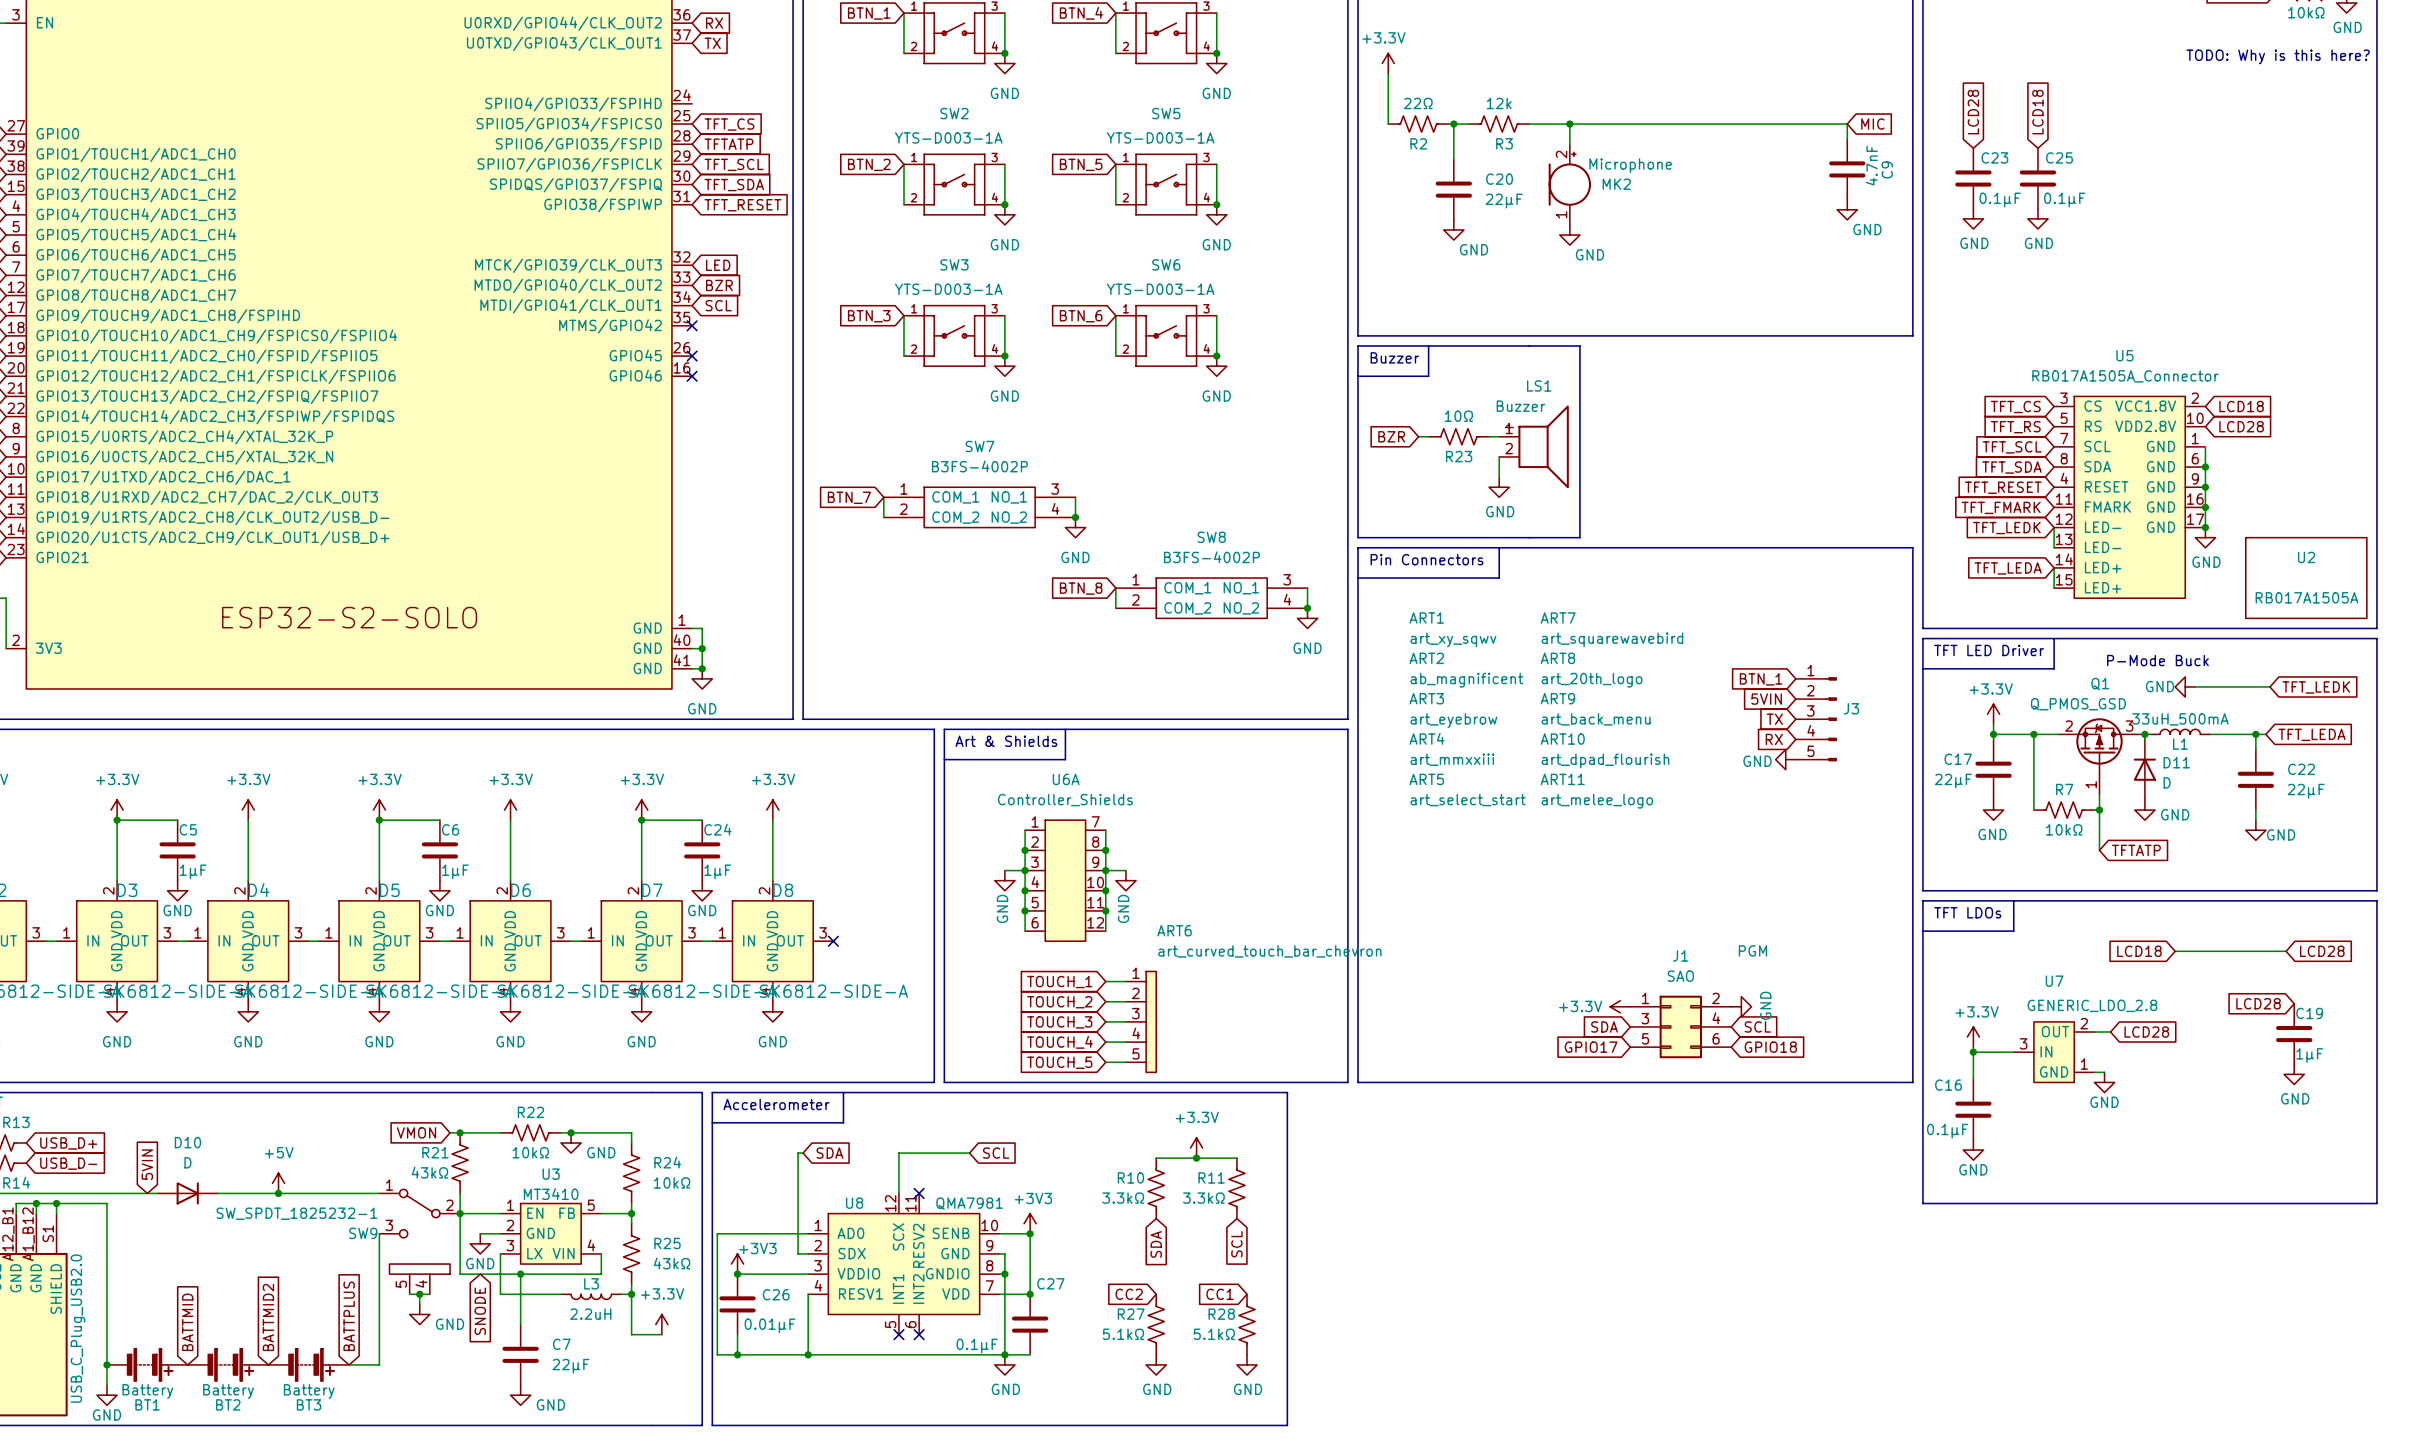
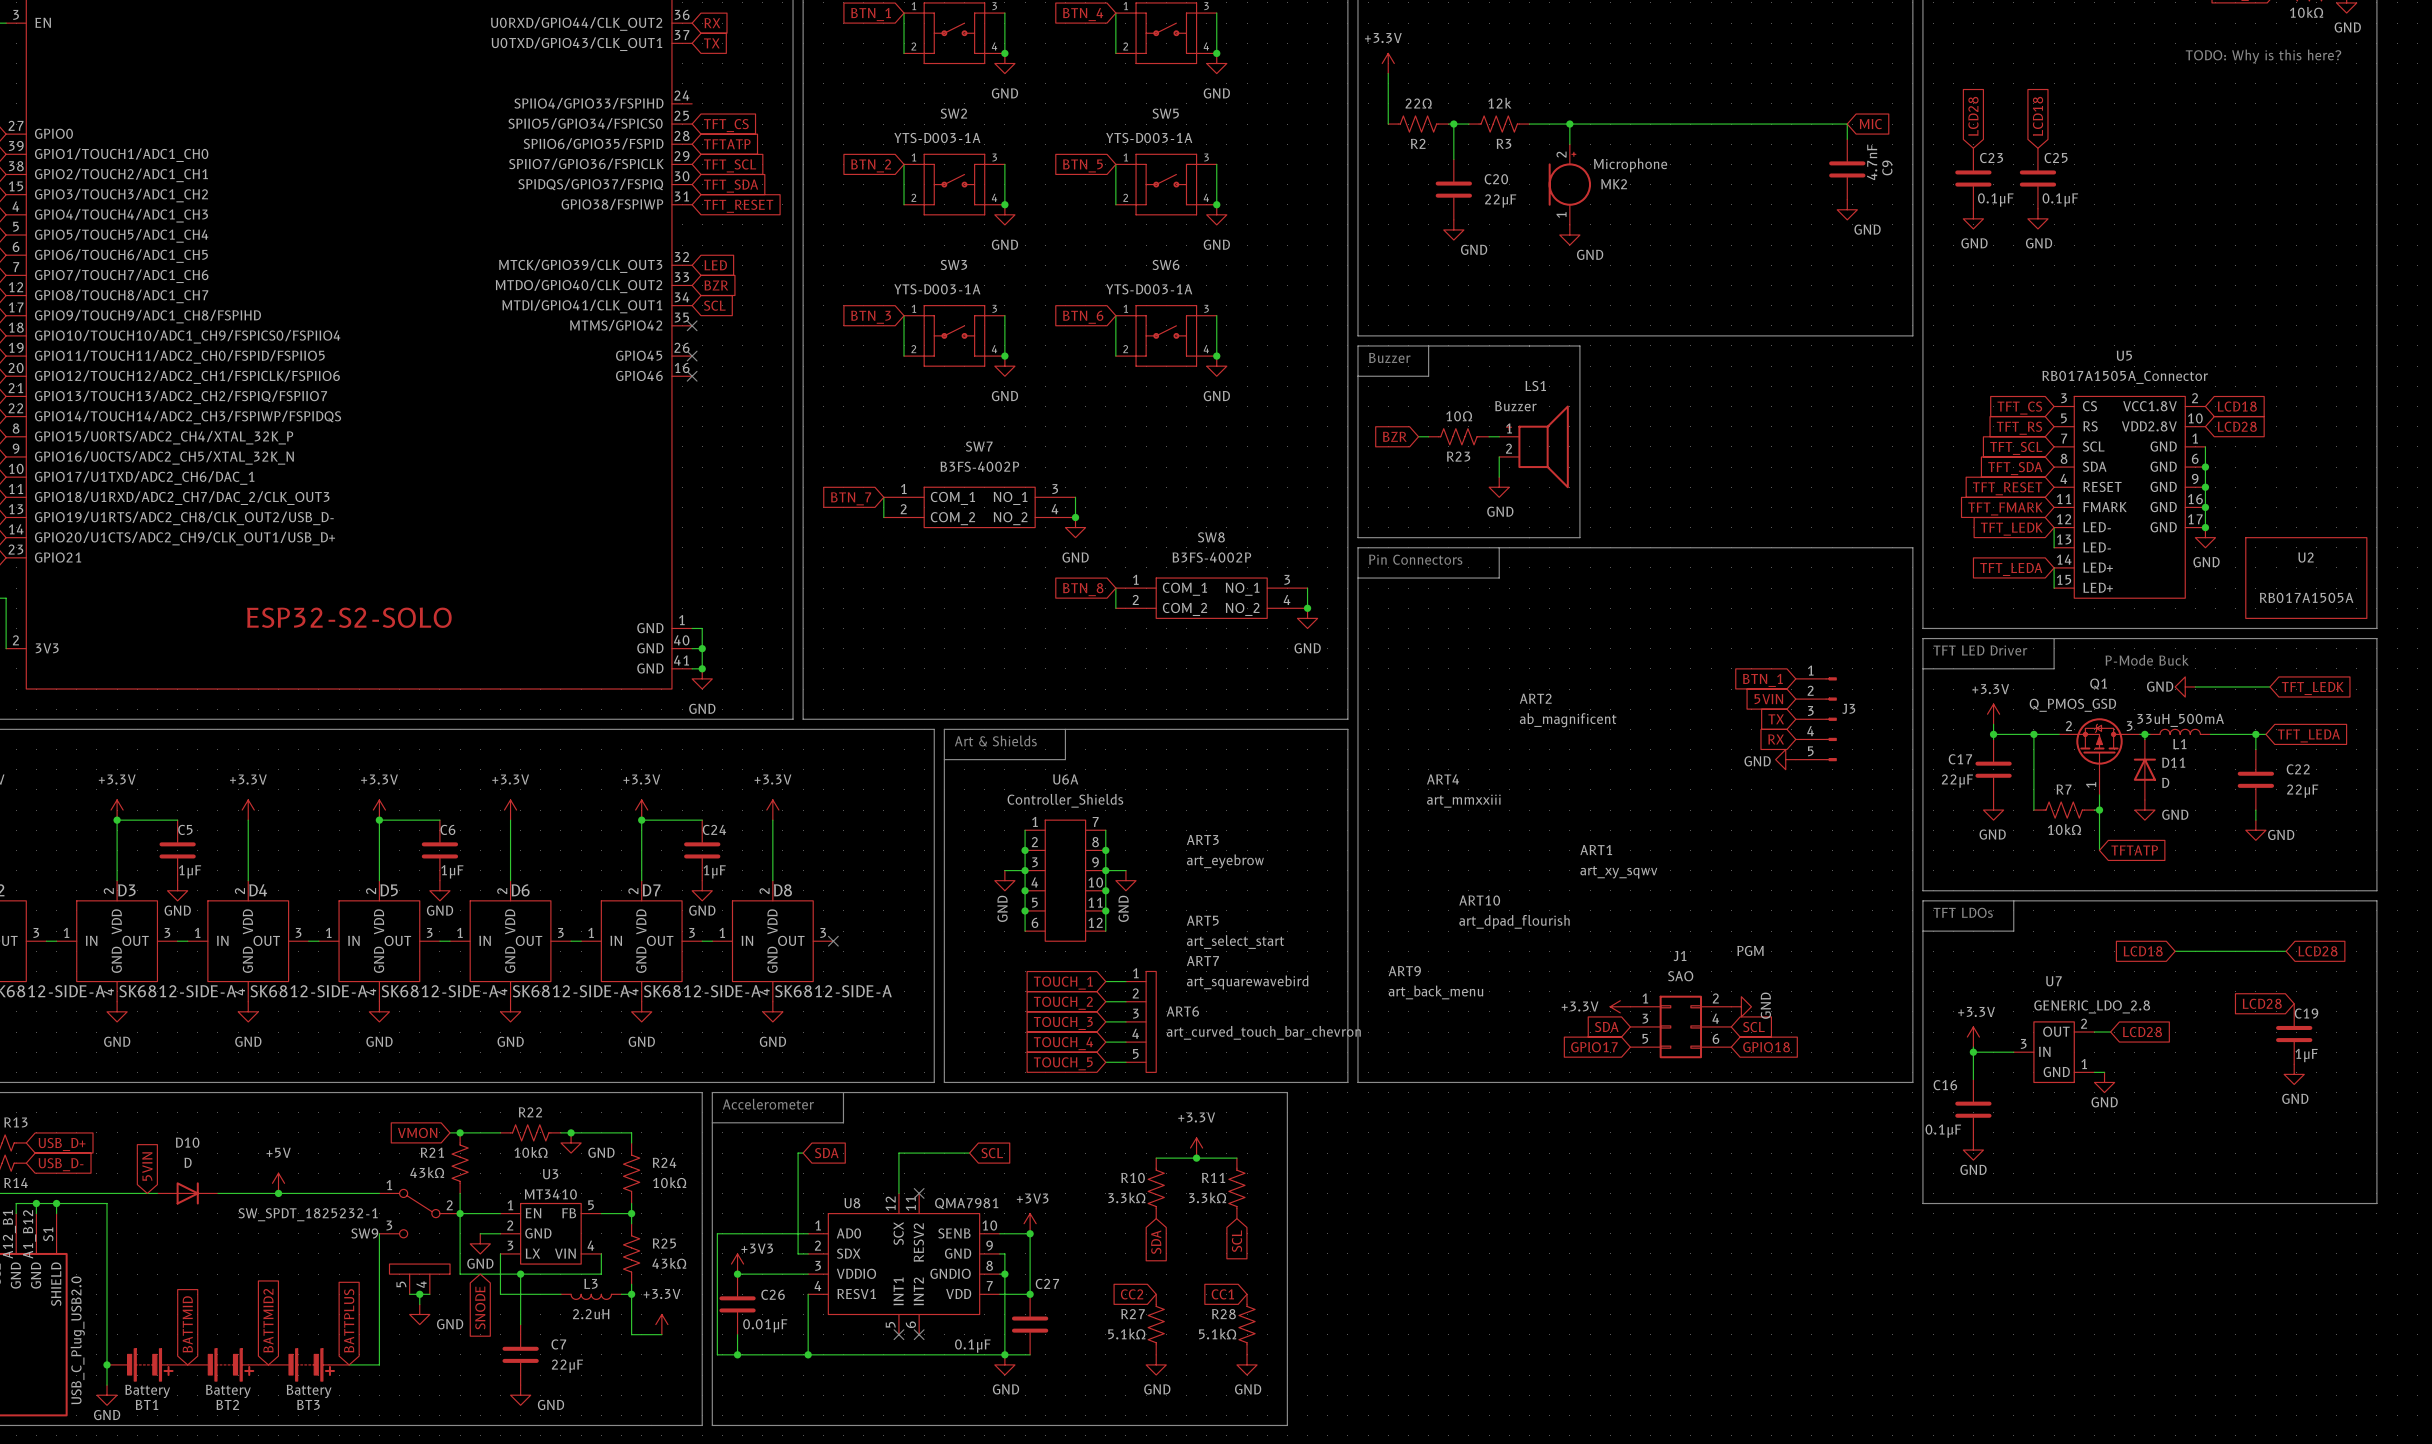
ART1 position: (1452, 629) -> (1618, 861)
ART7 position: (1611, 629) -> (1247, 972)
ART2 position: (1466, 670) -> (1568, 710)
ART8: art_20th_logo (1591, 670) -> none
ART9 position: (1595, 709) -> (1435, 982)
ART3 position: (1453, 710) -> (1225, 851)
ART4: art_mmxxiii (1451, 749) -> none
ART10 position: (1604, 750) -> (1514, 912)
ART5 name: ART5 (1426, 779) -> ART4 (1443, 779)
ART11: art_melee_logo (1596, 791) -> none
ART5 value: art_select_start (1468, 800) -> art_mmxxiii (1463, 801)
ART6 name position: ART6 (1174, 930) -> ART6 (1182, 1011)
ART5: none -> art_select_start (1235, 932)
ART6 value position: art_curved_touch_bar_chevron (1269, 951) -> art_curved_touch_bar_chevron (1263, 1032)

